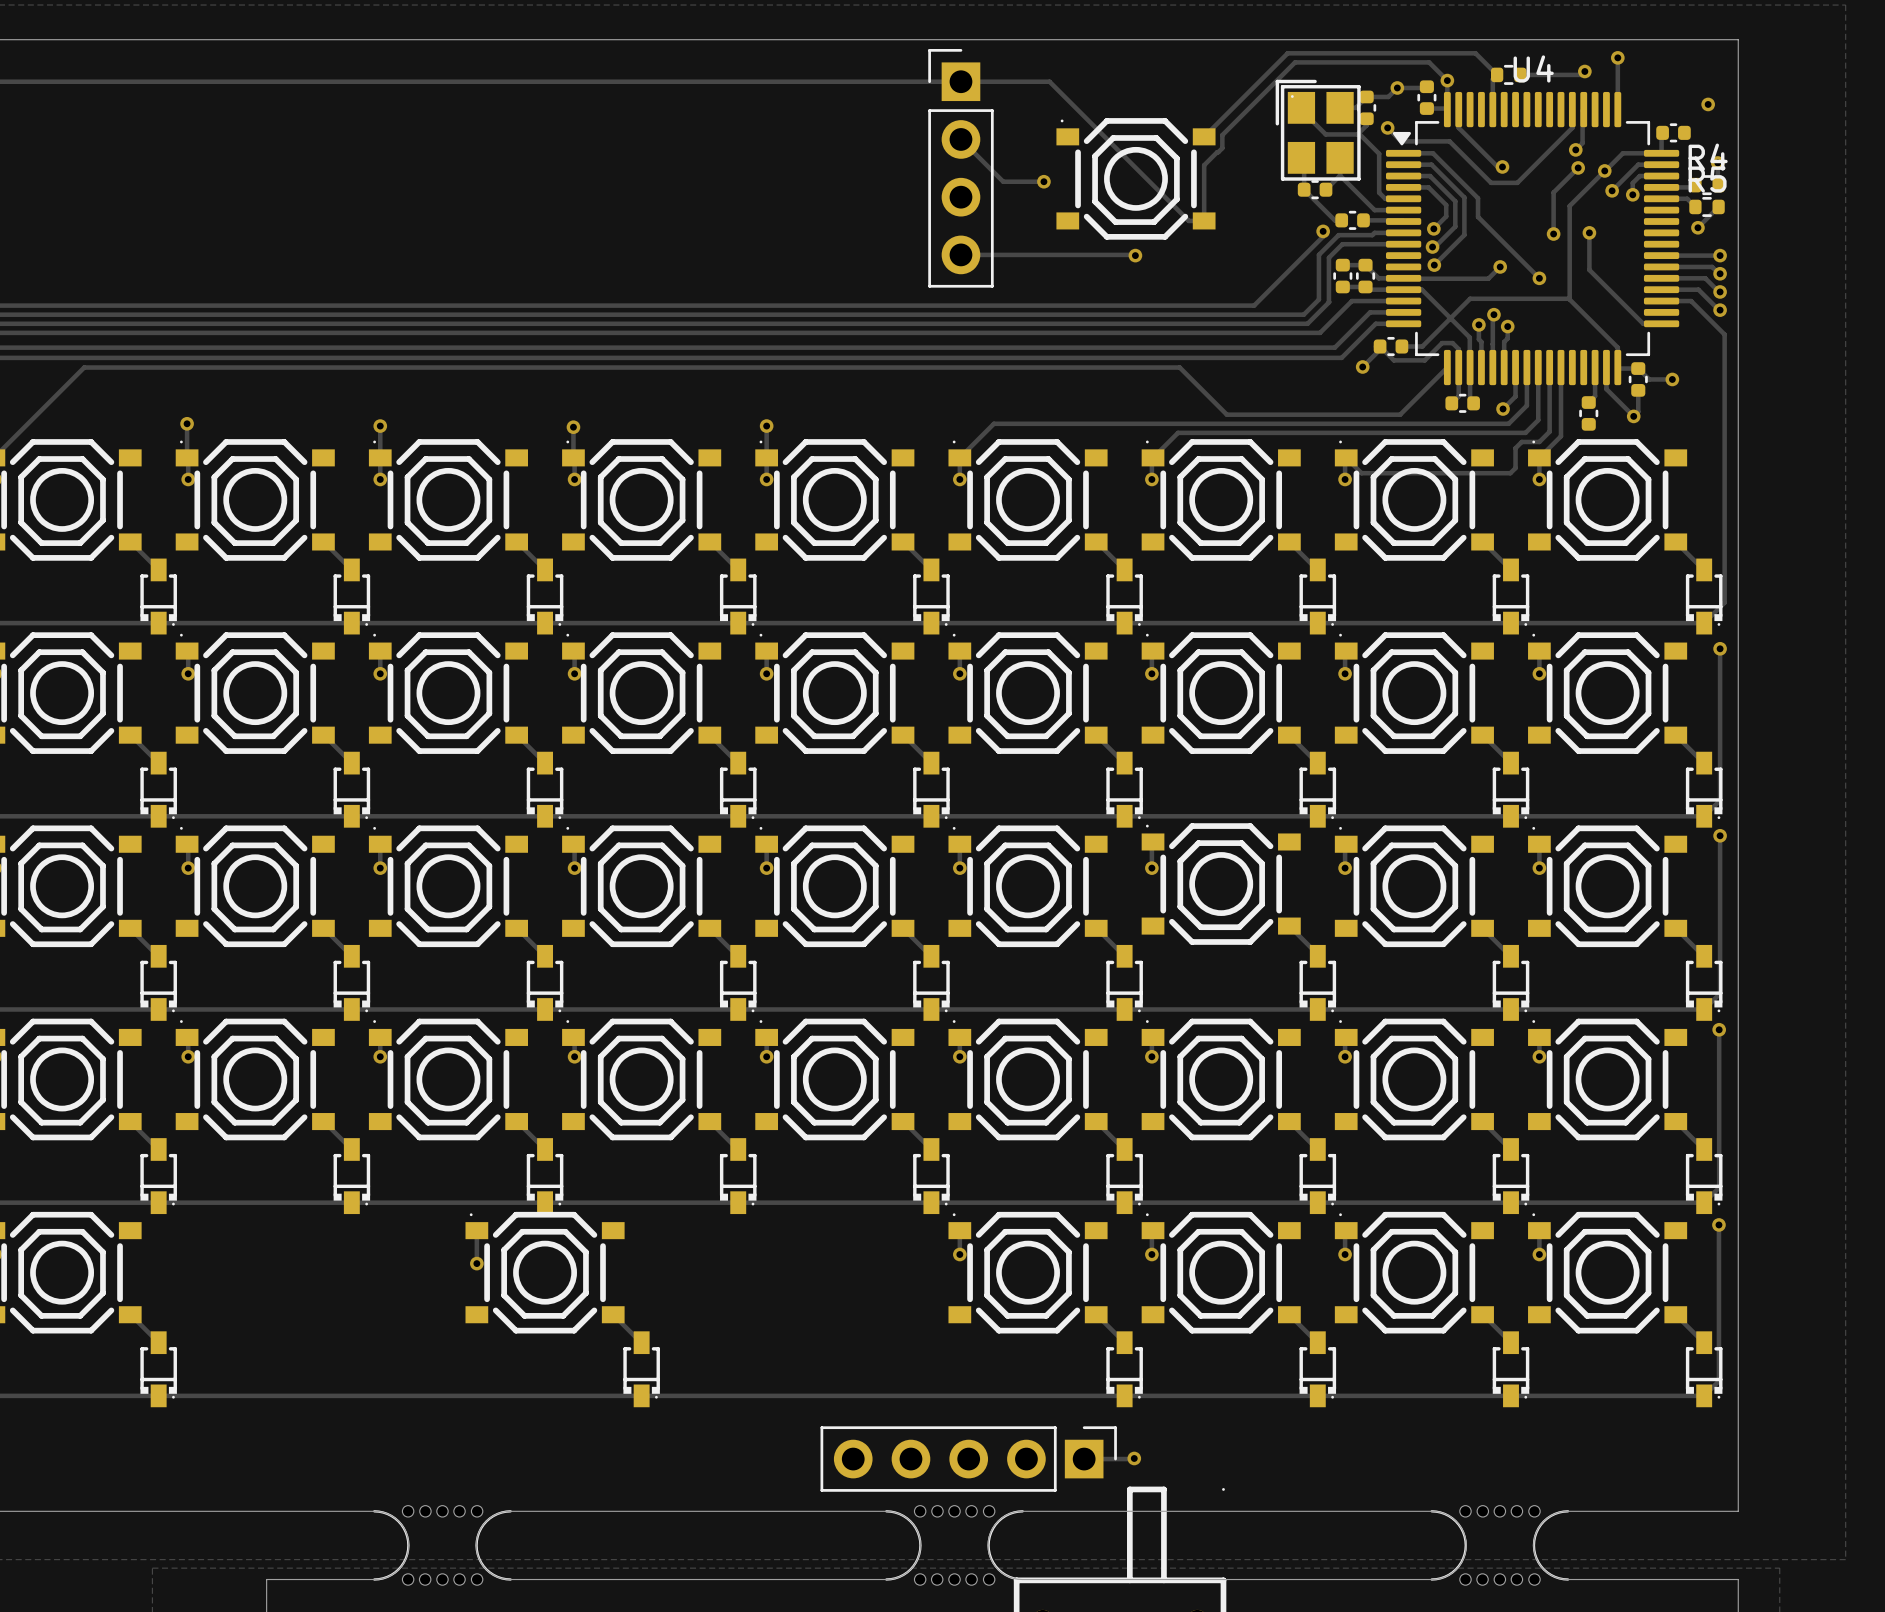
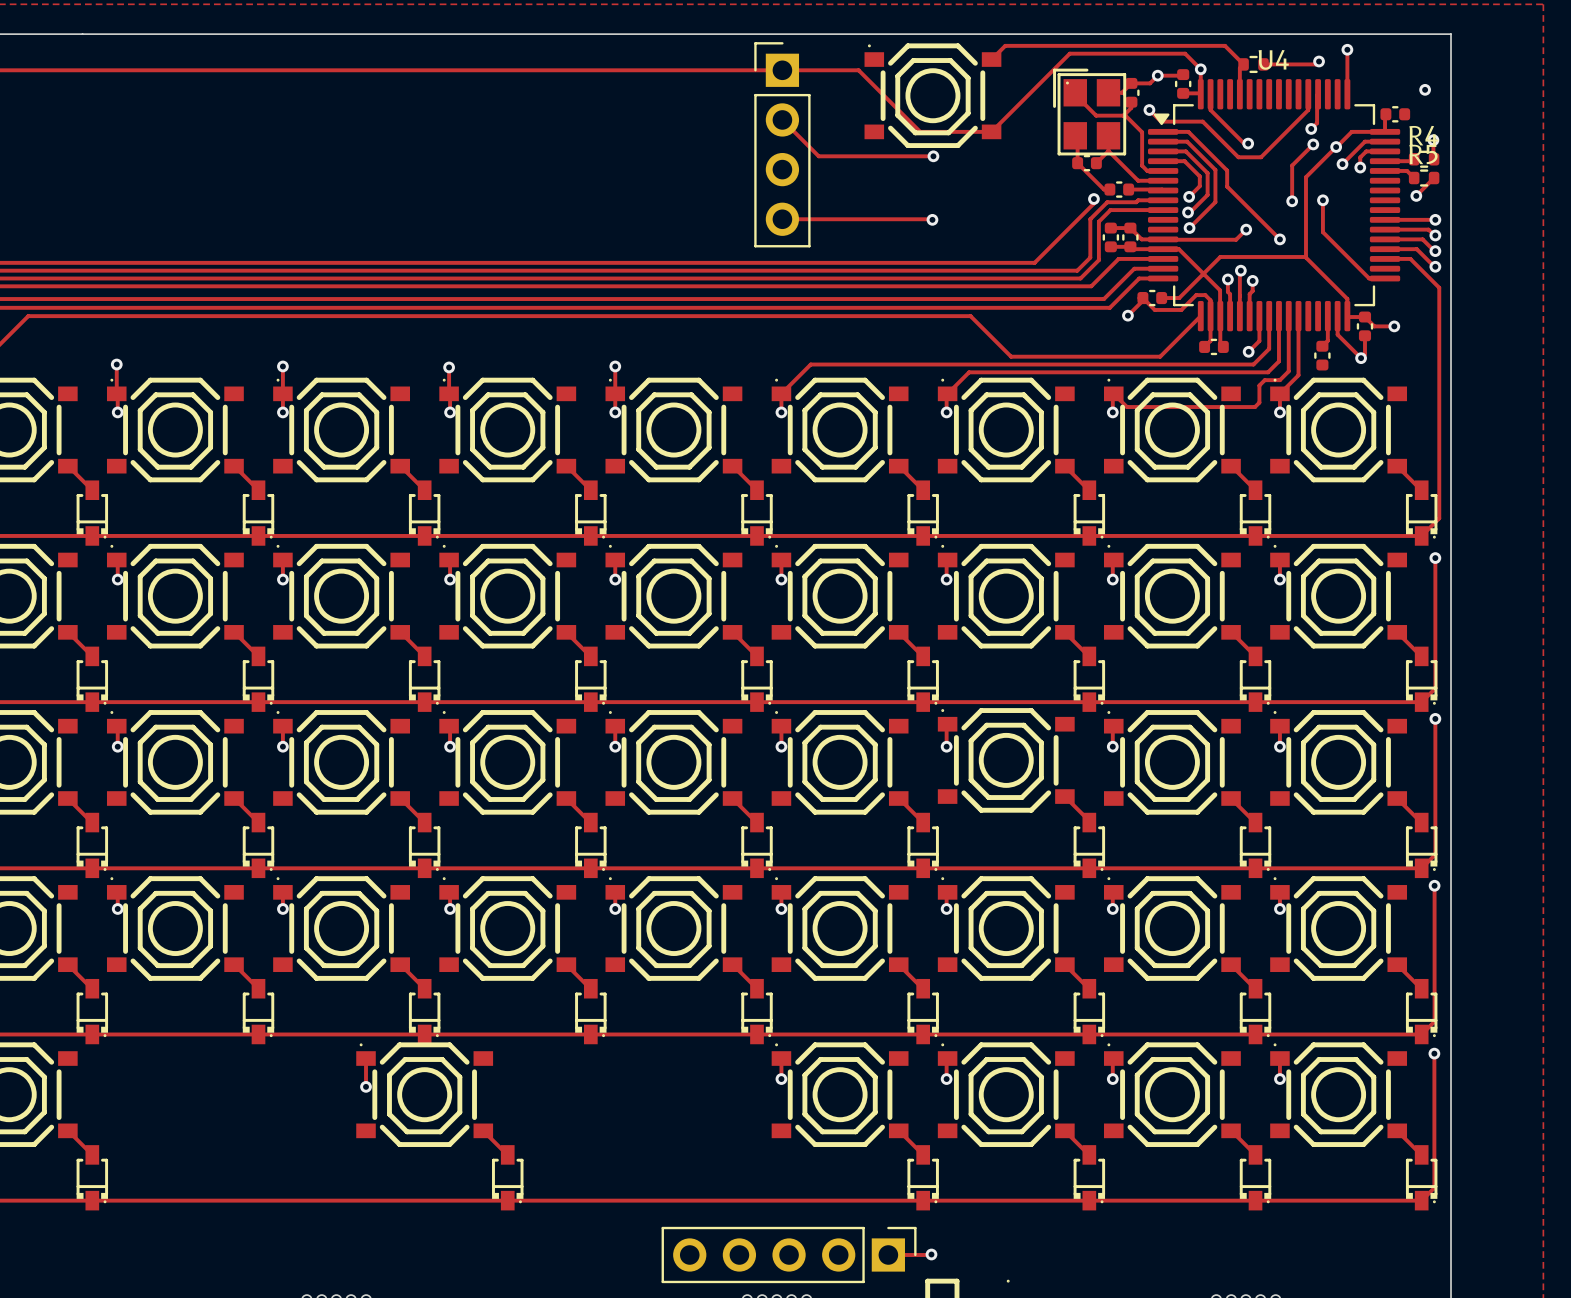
track: (1287, 53) (1204, 136) -> (1063, 45) (1005, 45) (991, 59)
track: (1222, 135) (1222, 148) (1204, 165) (1204, 220) (1188, 220) (1121, 153) -> (1007, 116) (991, 131) (920, 131)
part position: (1135, 178) -> (932, 95)
track: none -> (853, 156) (933, 156)
via position: (1043, 181) -> (933, 156)

